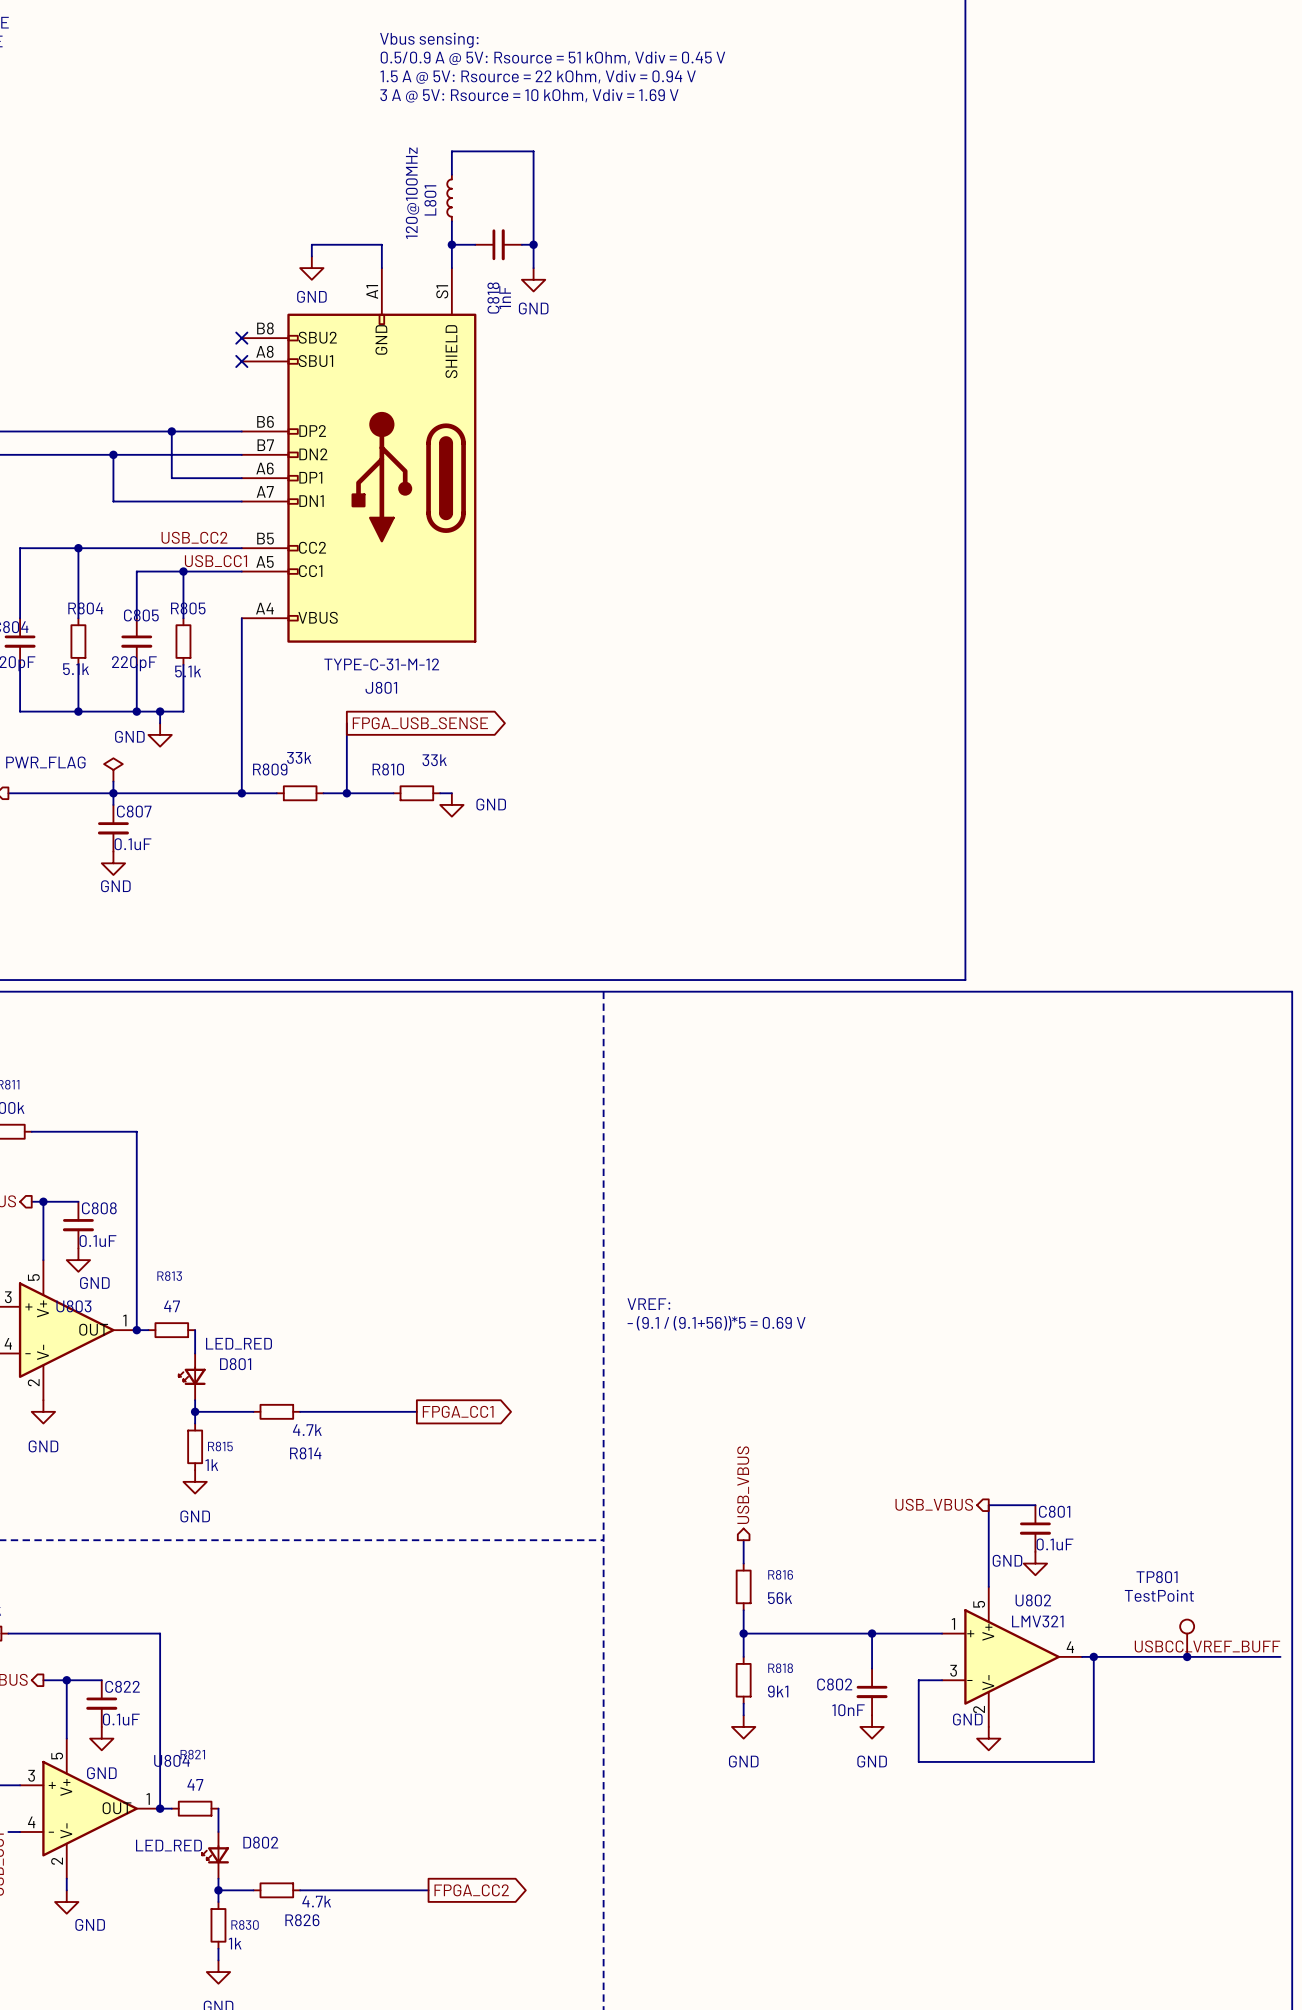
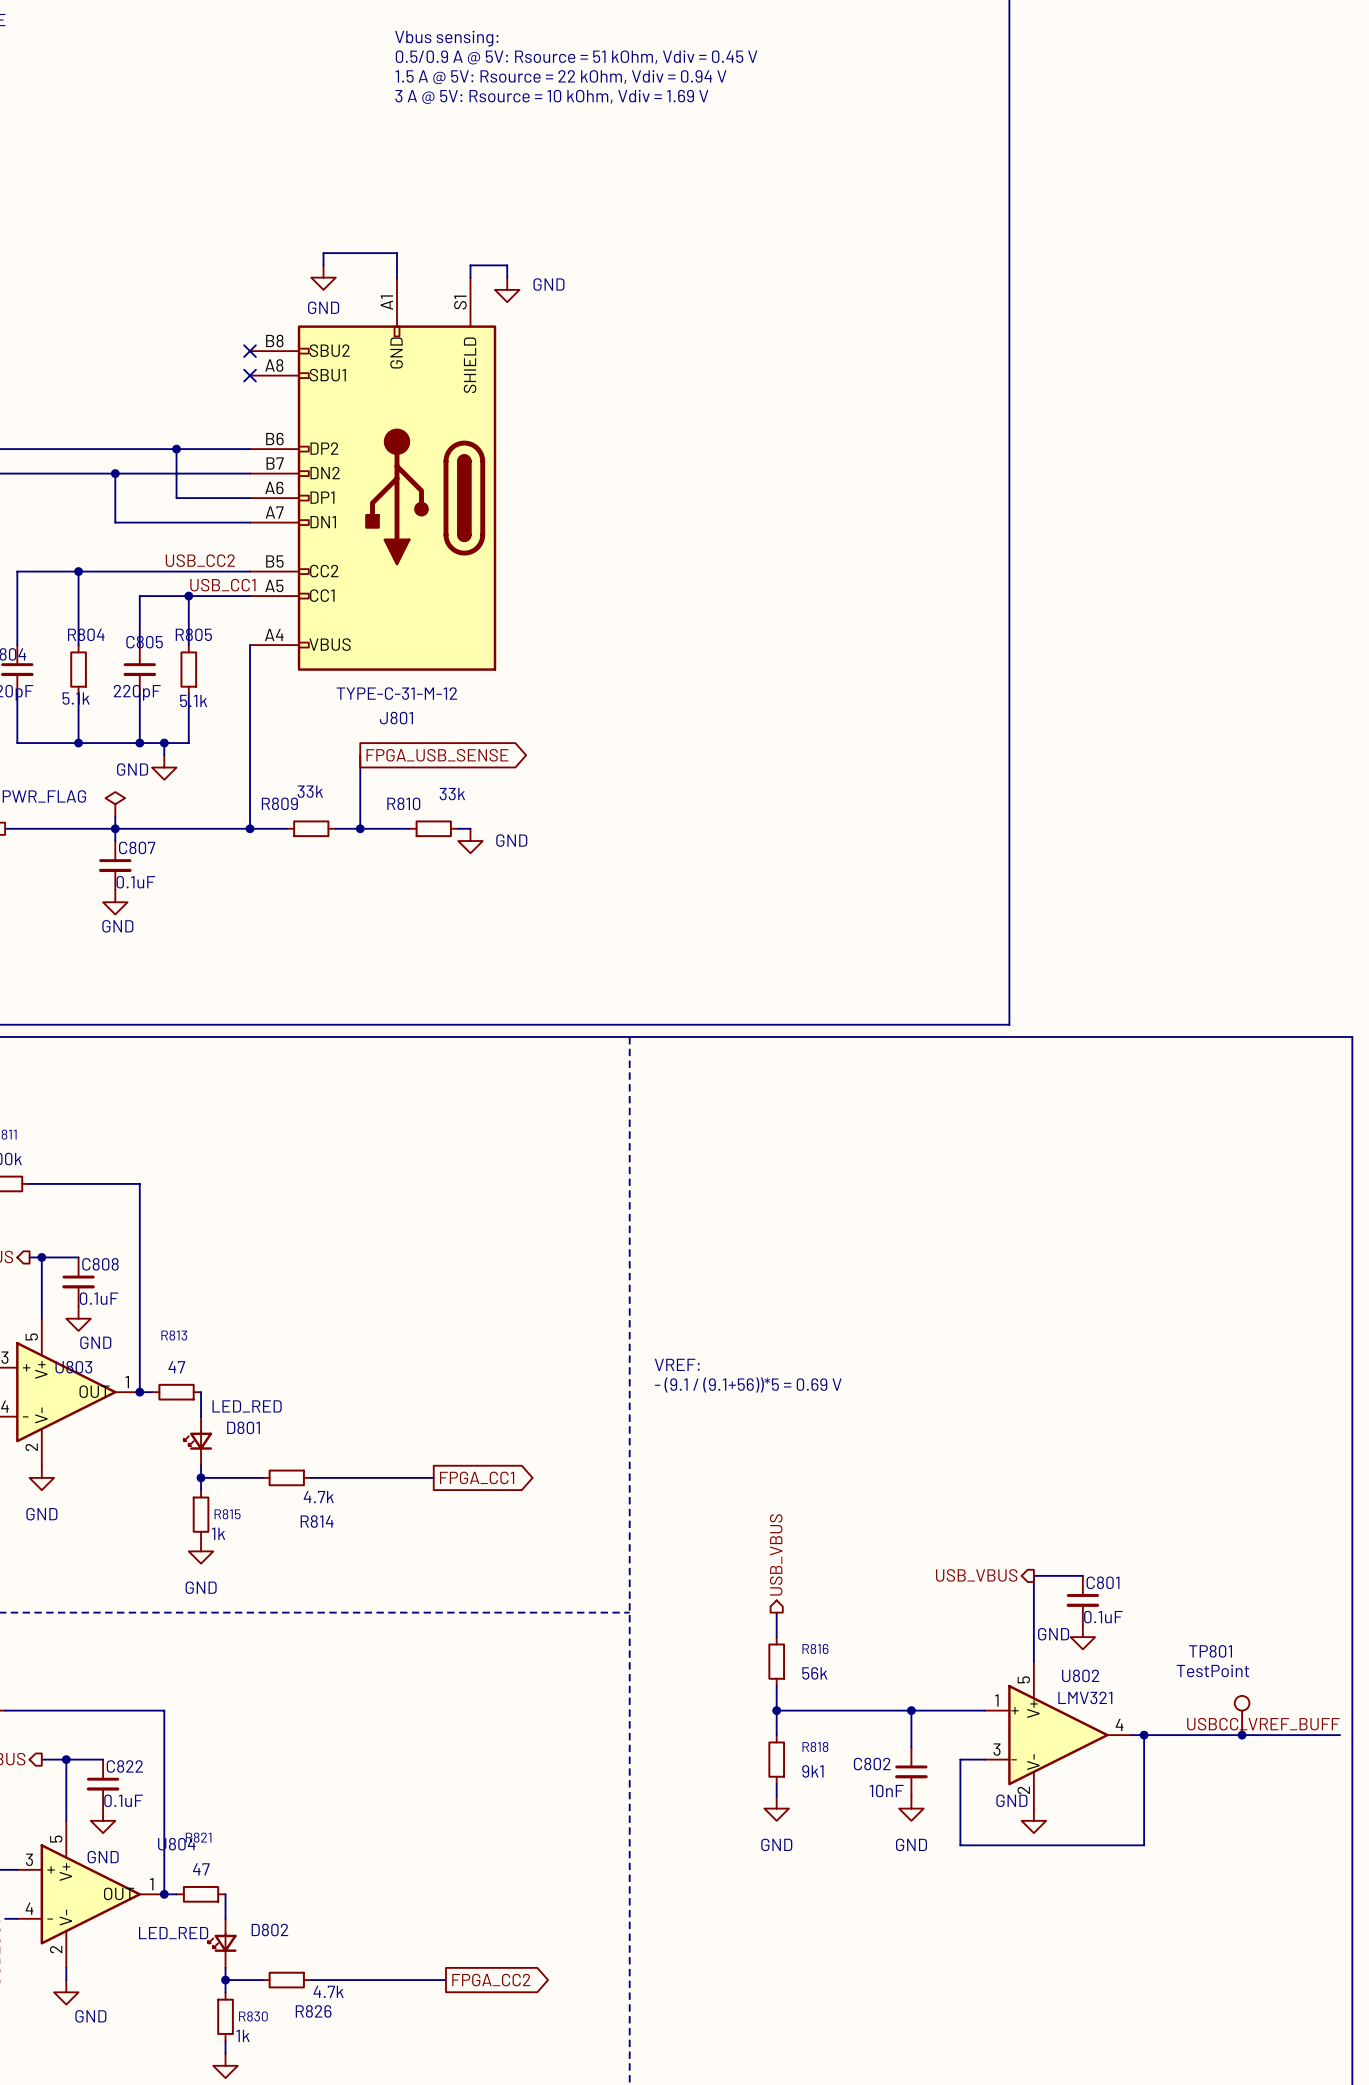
wire: (451, 174) (451, 151) (533, 151) (533, 268) -> none
L801: 120@100MHz (449, 198) -> none
wire: (451, 221) (451, 256) -> (507, 277) (507, 265) (470, 265)
wire: (451, 244) (475, 244) -> none
junction: (451, 244) -> none
C818: 1nF (498, 244) -> none
wire: (521, 244) (533, 244) -> none
junction: (533, 244) -> none
power symbol position: GND (533, 279) -> GND (507, 289)
power symbol text position: GND (533, 308) -> GND (548, 284)

